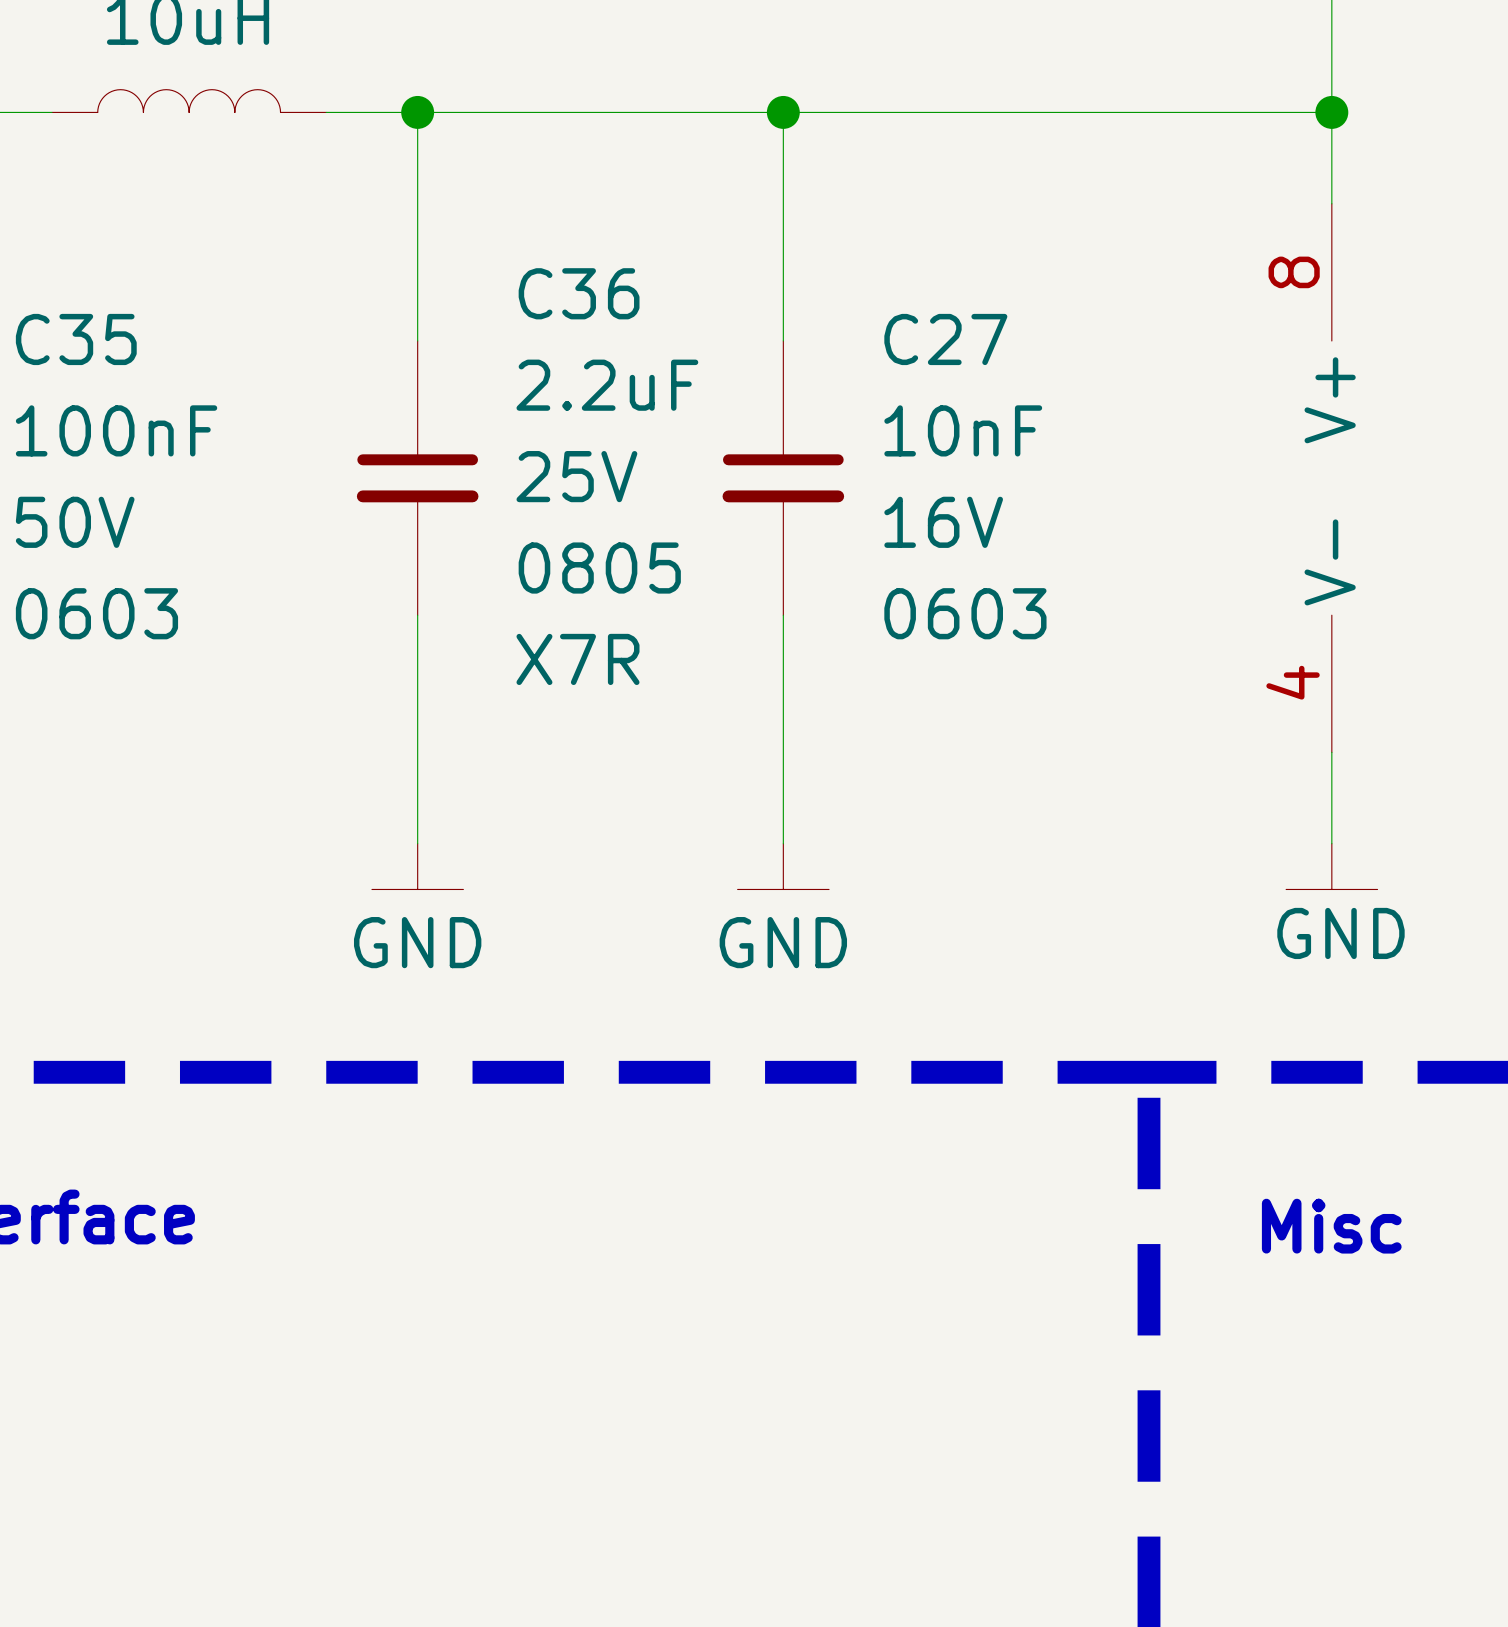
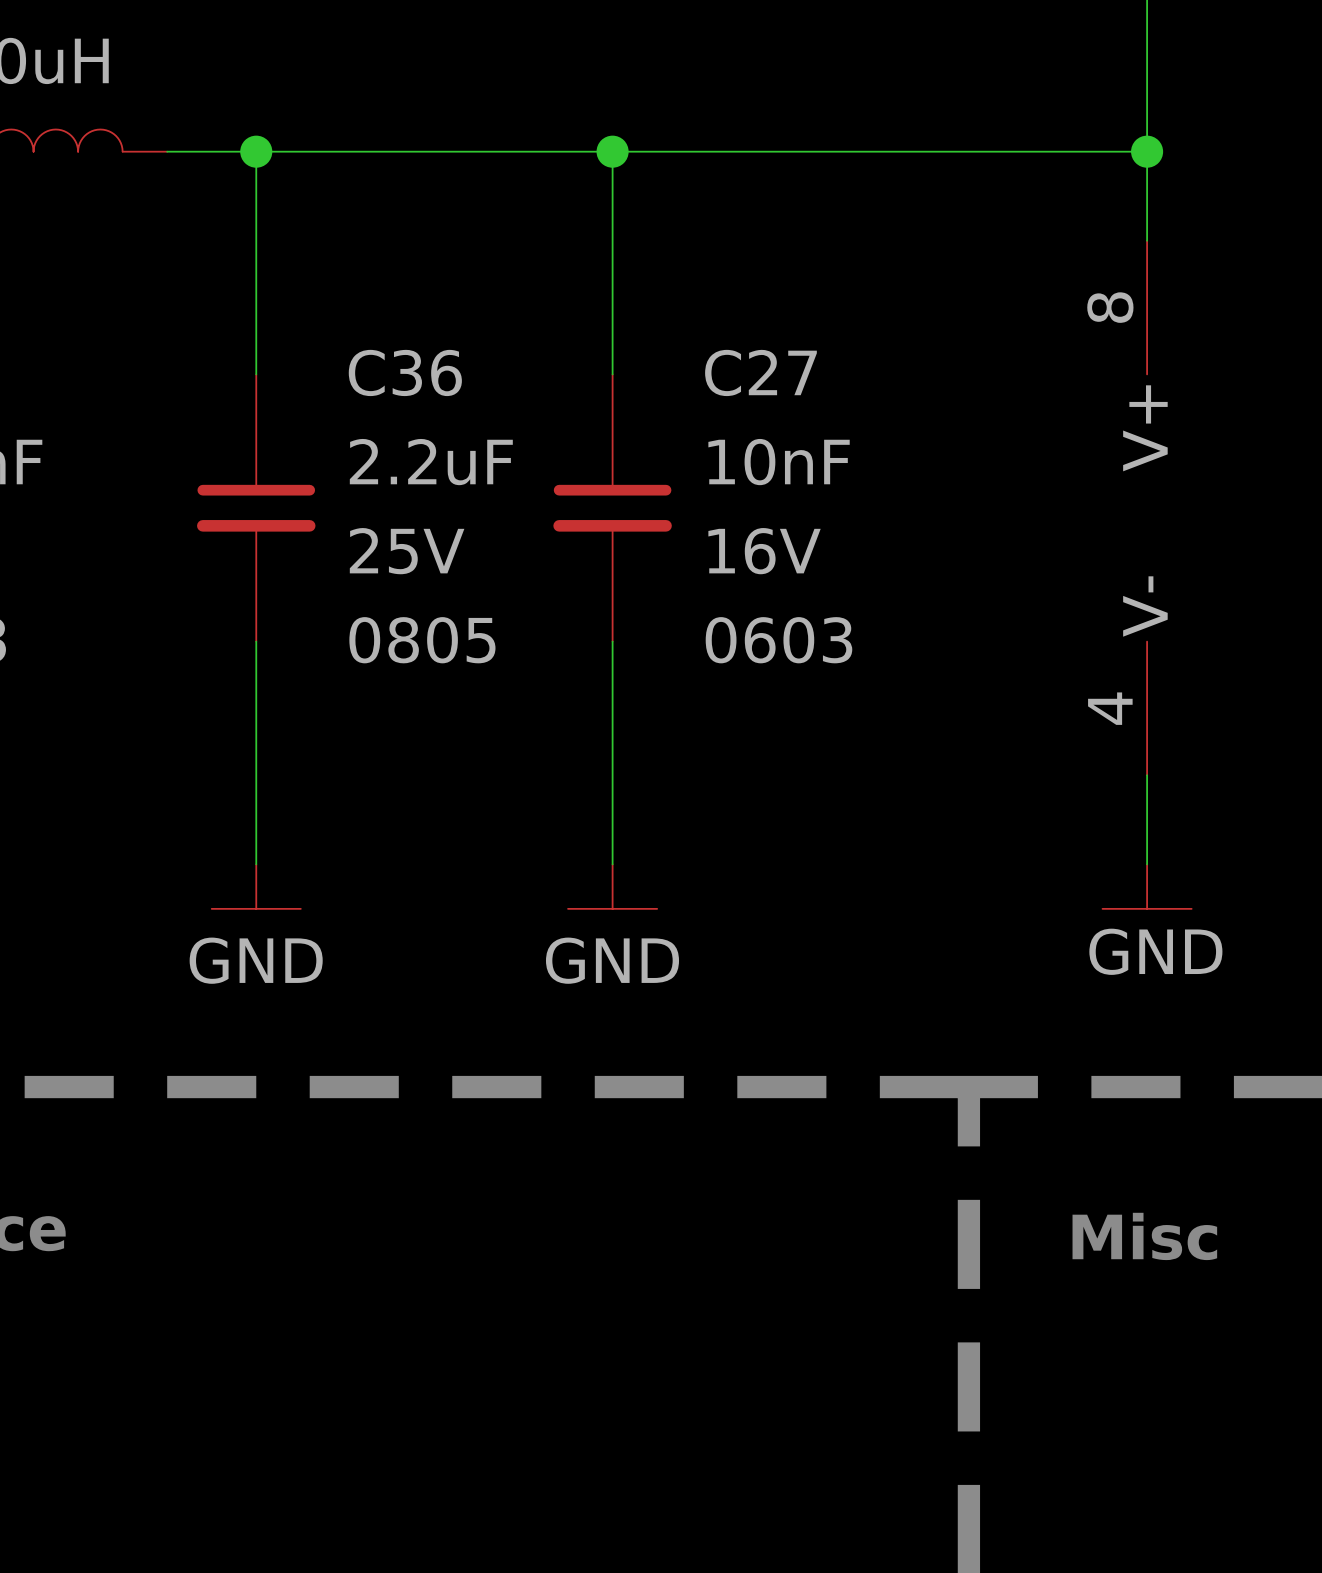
C36 name position: C36 (579, 293) -> C36 (405, 372)
C36 value position: 2.2uF (607, 385) -> 2.2uF (431, 462)
C36 text position: 25V (576, 476) -> 25V (407, 551)
C36 text position: 0805 (599, 568) -> 0805 (422, 640)
C36 text: X7R (577, 659) -> none

